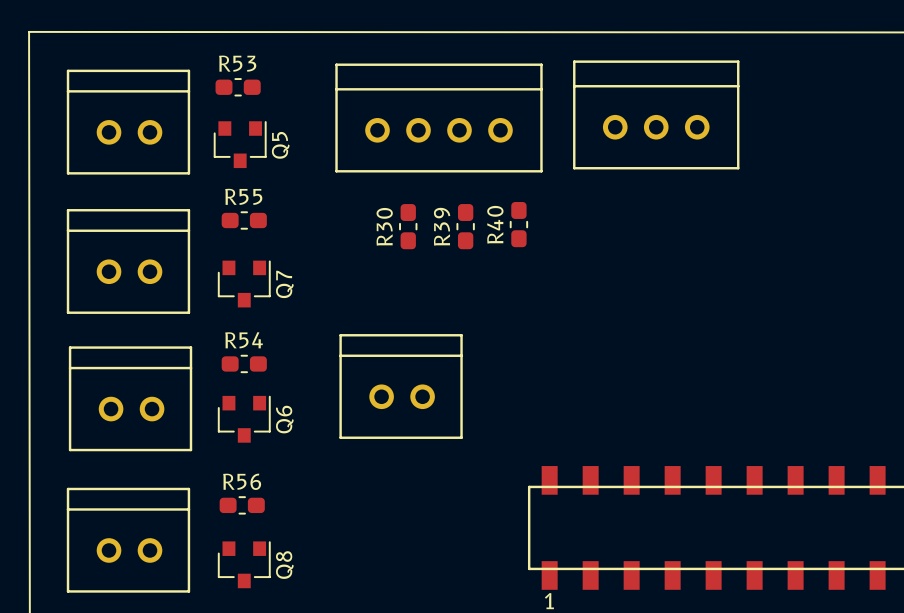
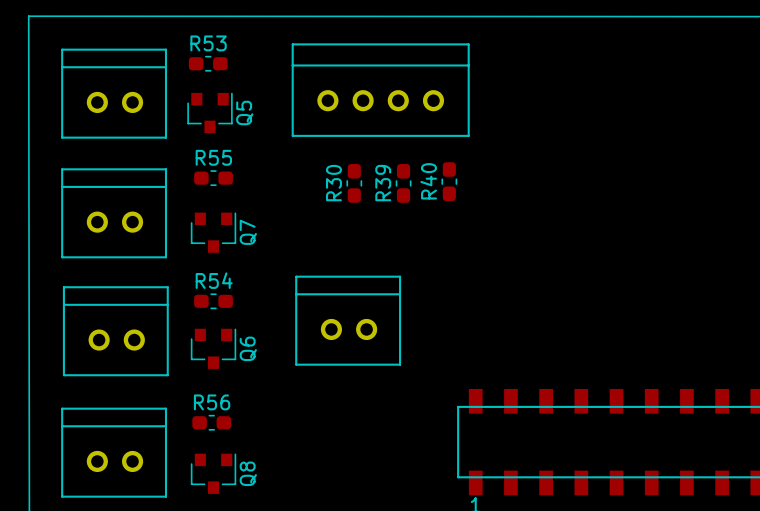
part: (656, 114) -> none

